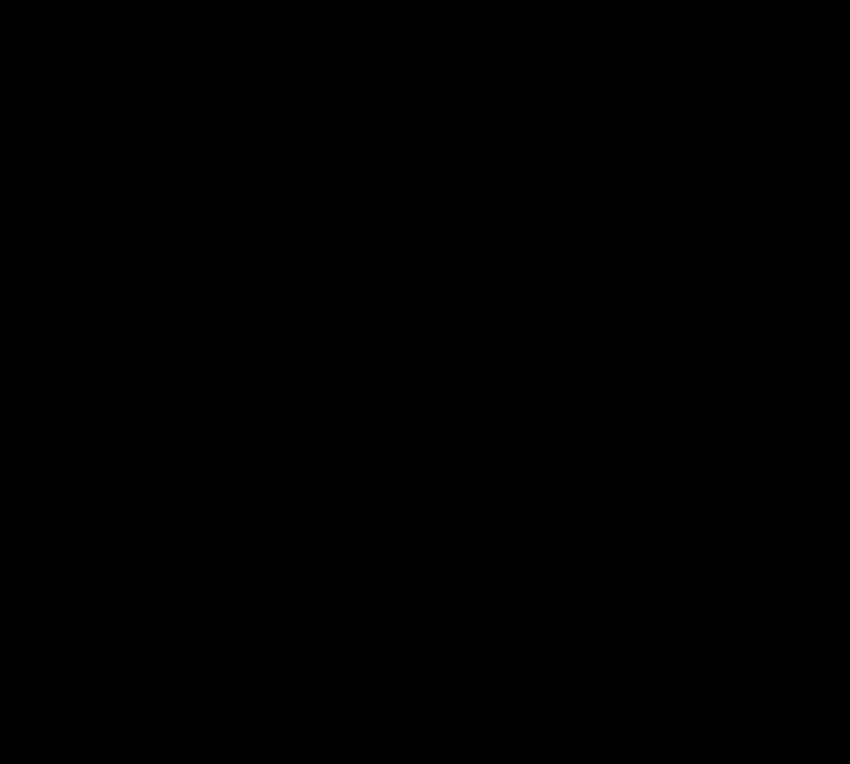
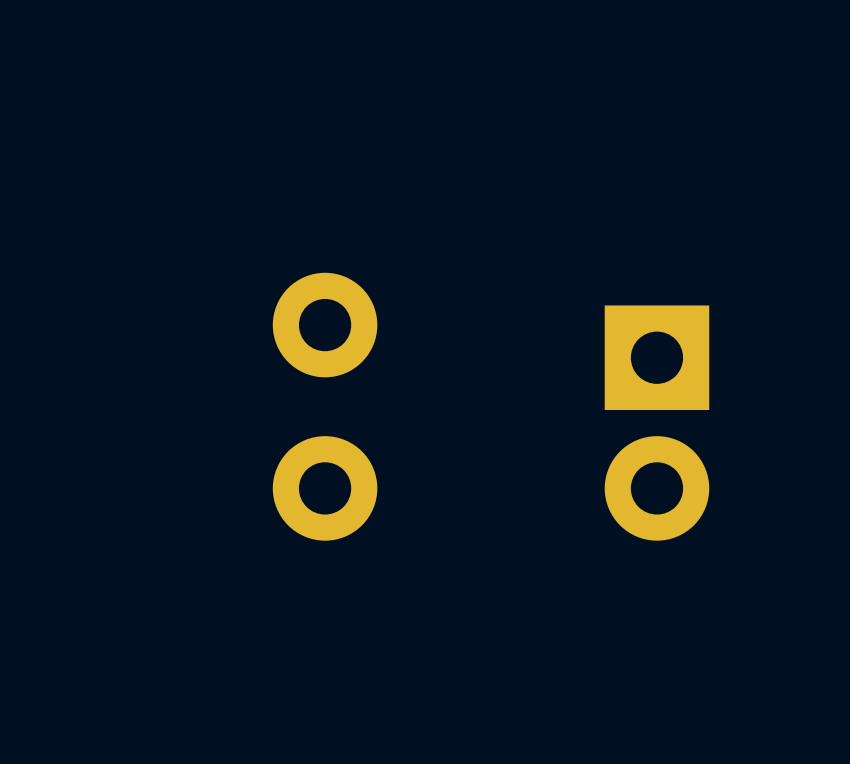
part: none -> (325, 406)
part: none -> (656, 423)

